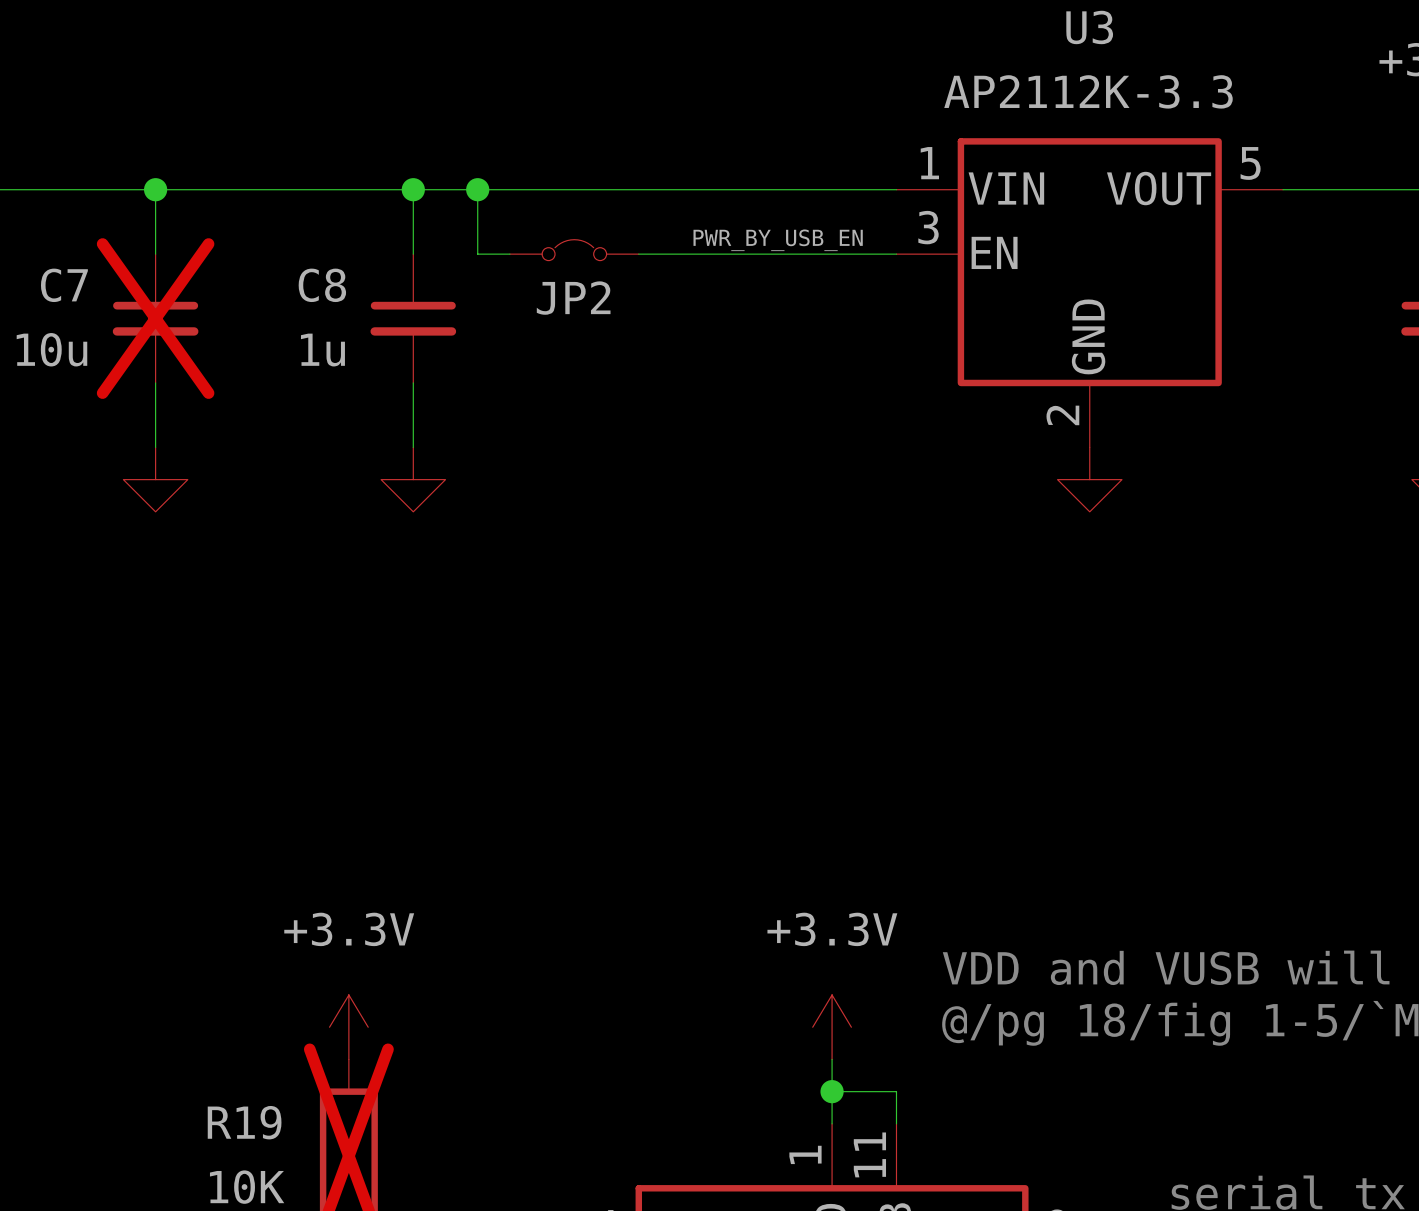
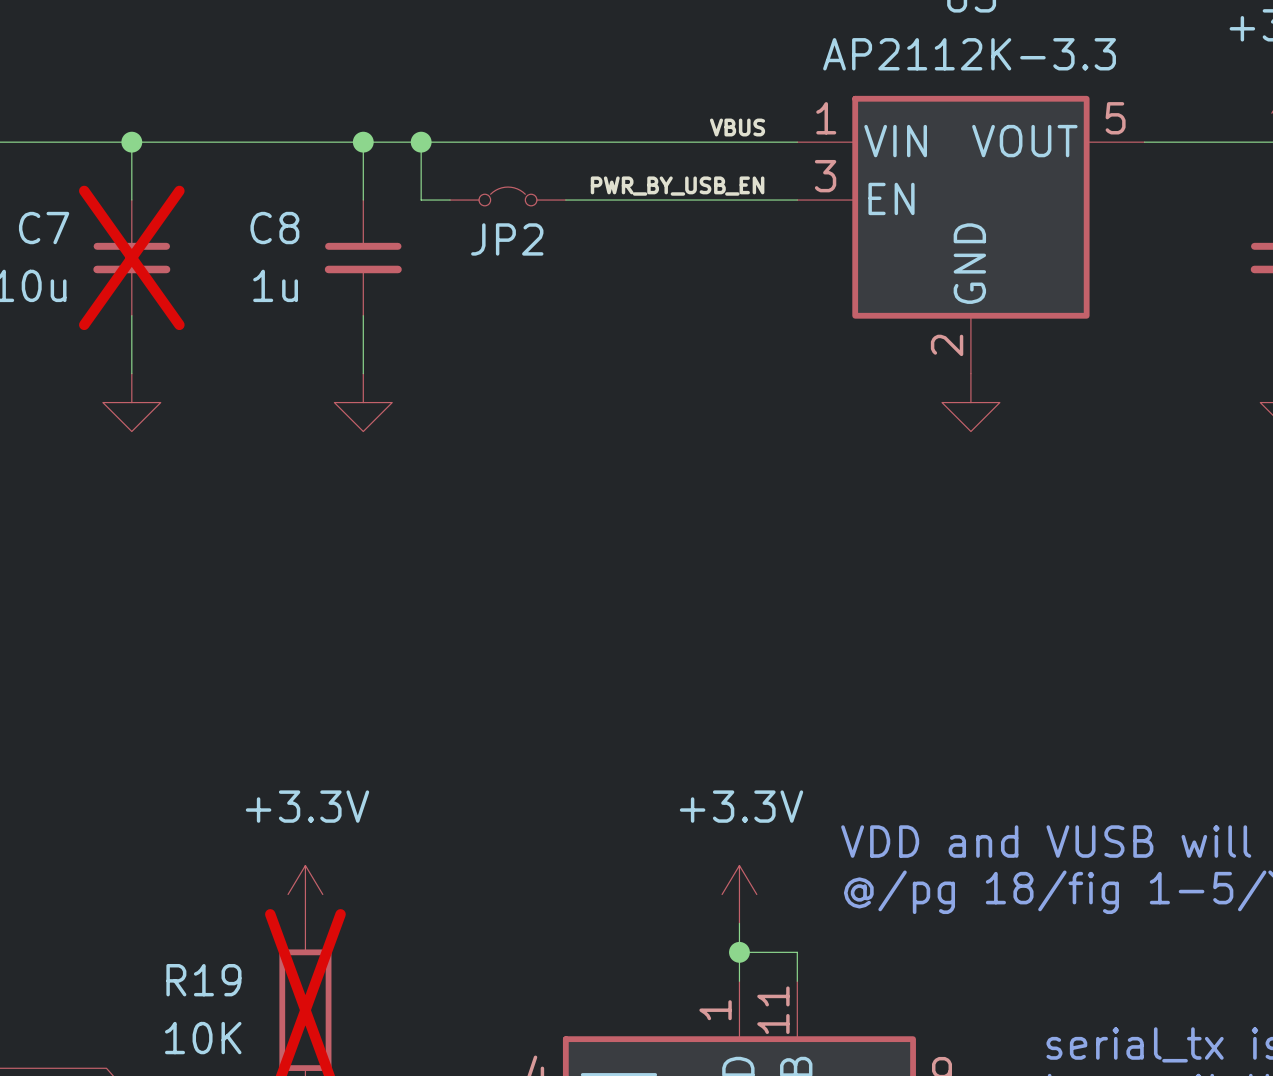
label: none -> VBUS (737, 127)

